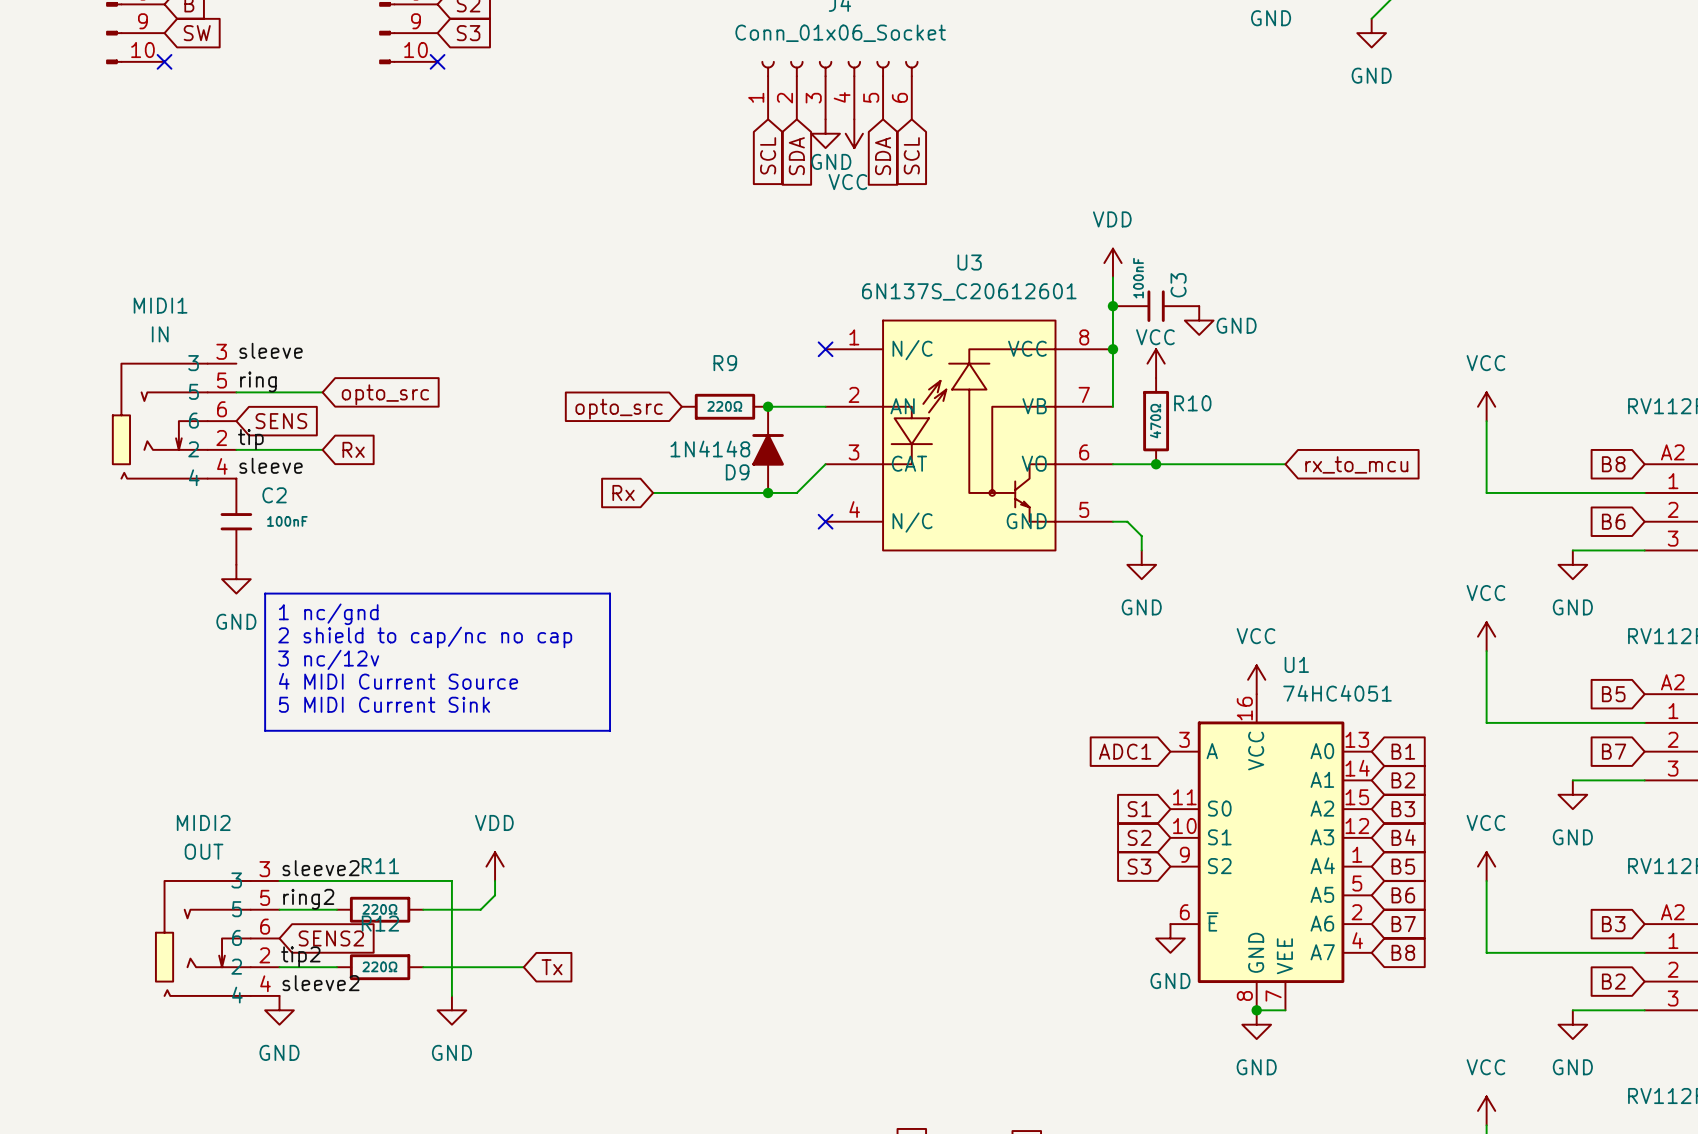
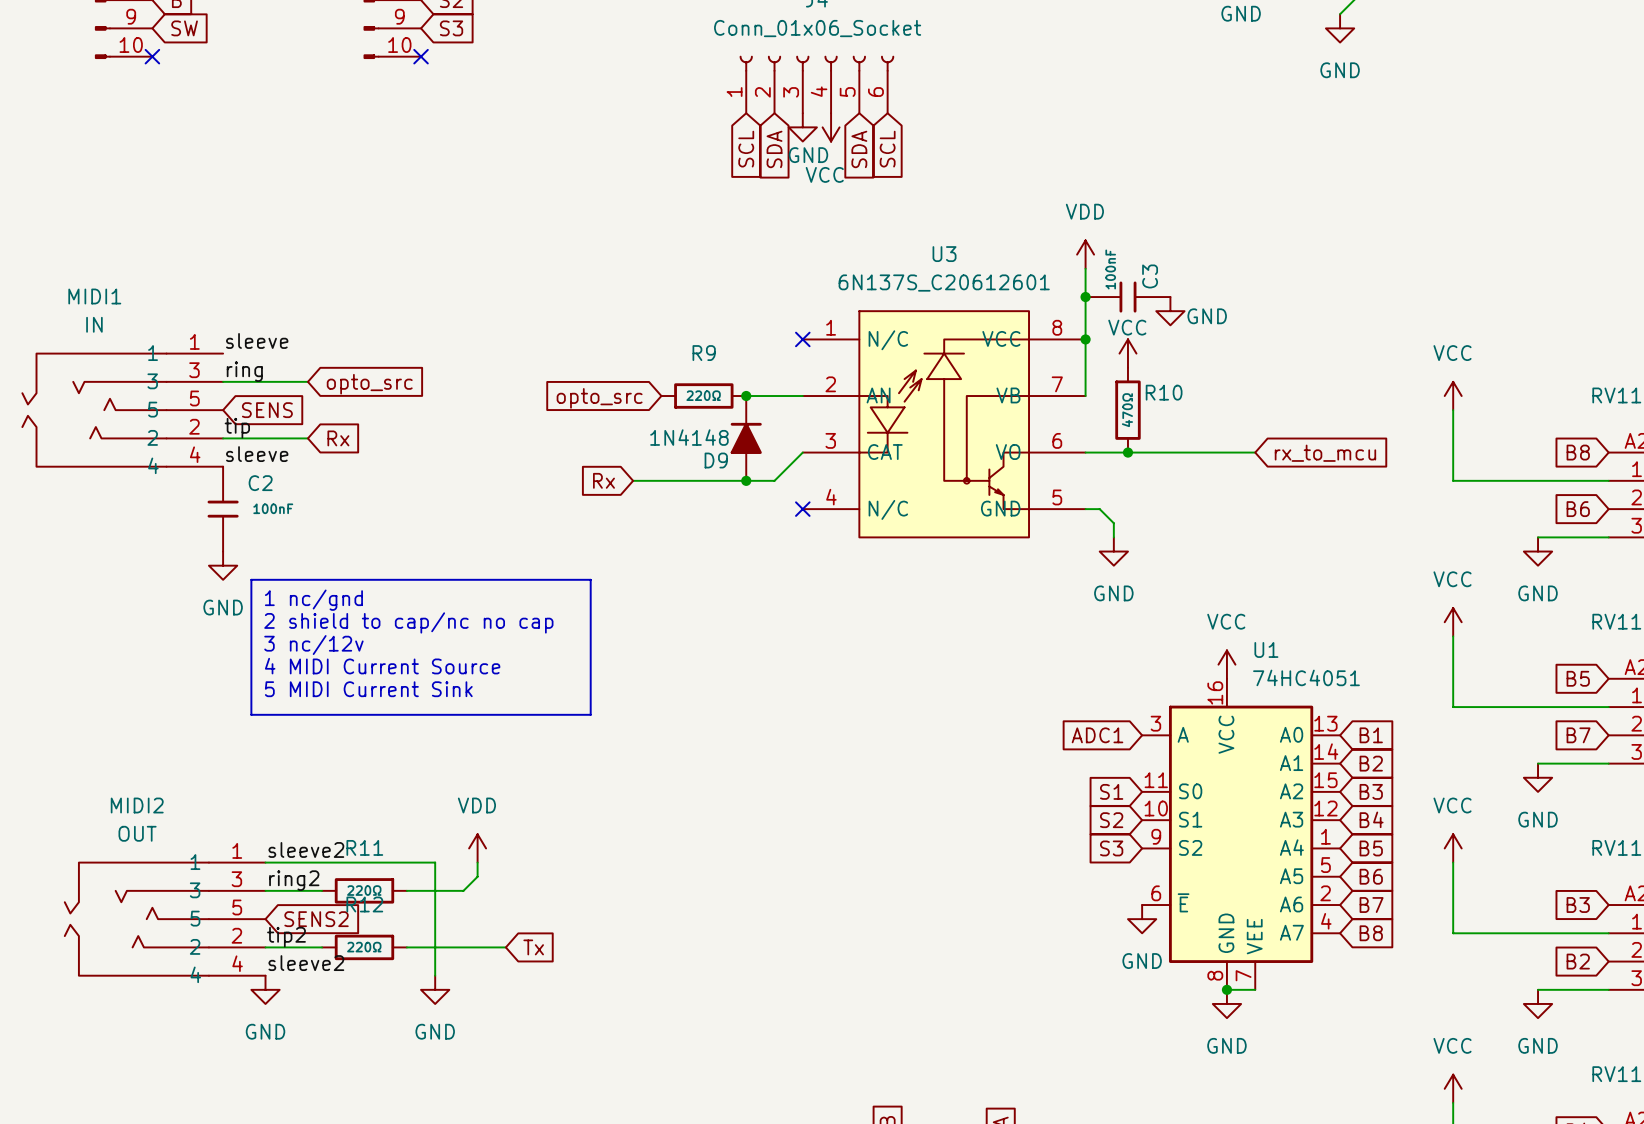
MIDI1 symbol: [112, 363, 237, 479] -> [22, 353, 224, 467]
MIDI2 symbol: [155, 880, 280, 996] -> [64, 862, 266, 976]

